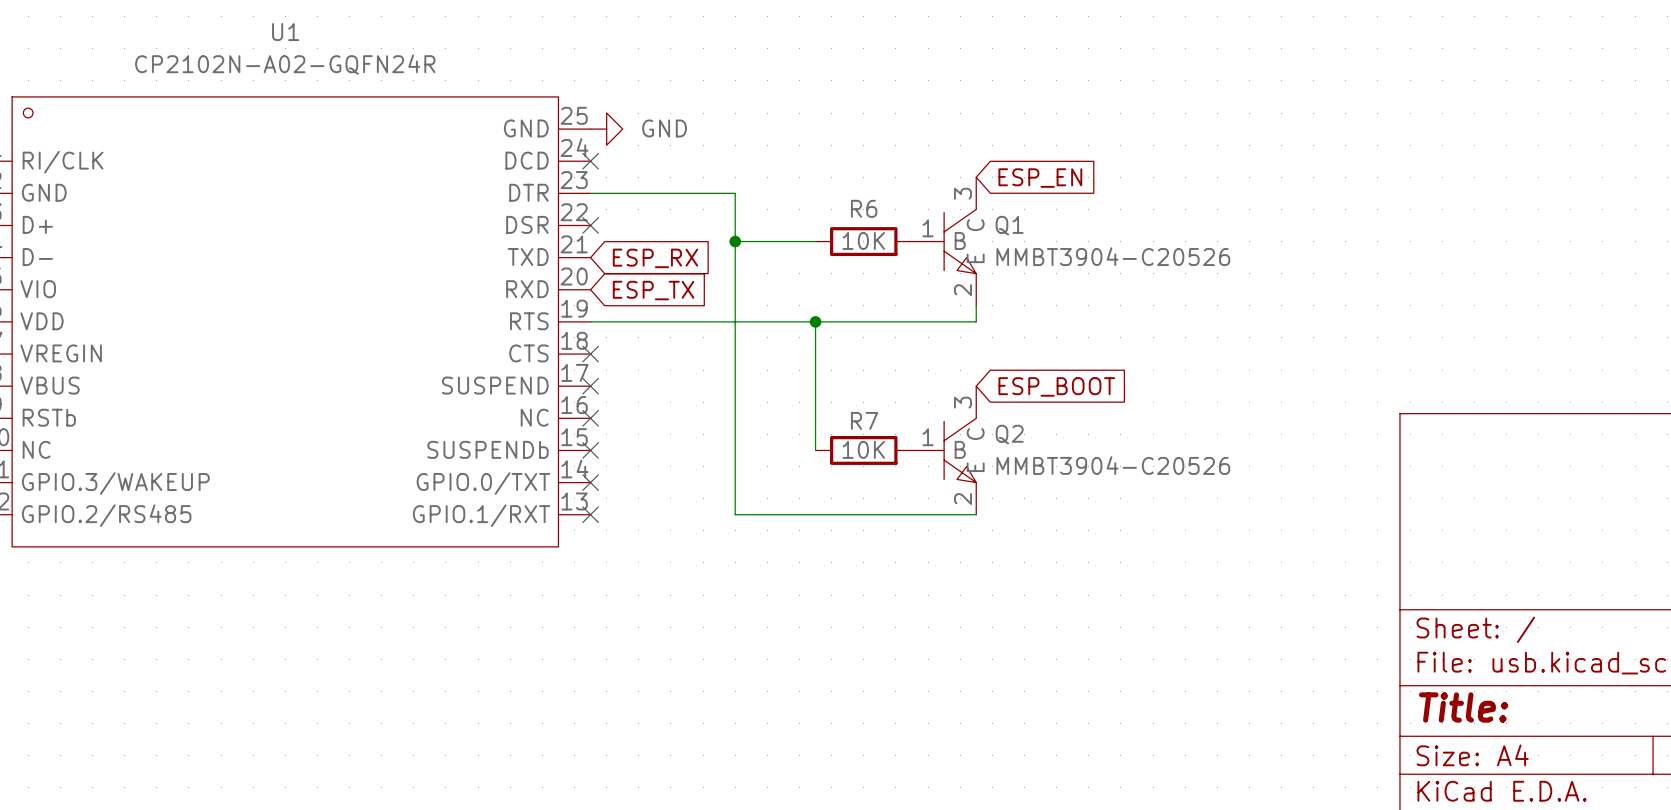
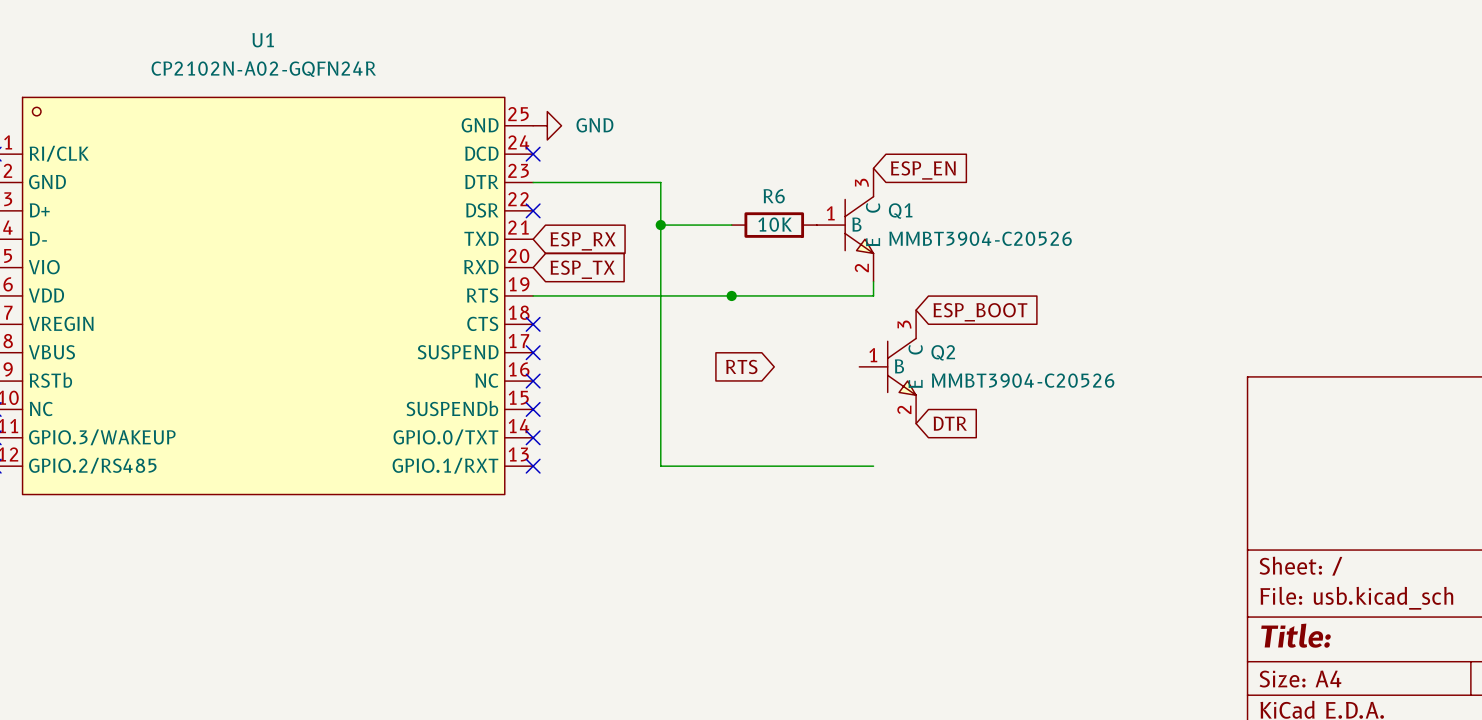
wire: (815, 321) (815, 450) -> none
global label position: ESP_BOOT (1056, 386) -> ESP_BOOT (980, 312)
global label: none -> RTS (741, 366)
R7: 10K (863, 450) -> none
Q2 position: (944, 450) -> (887, 366)
global label: none -> DTR (950, 423)

